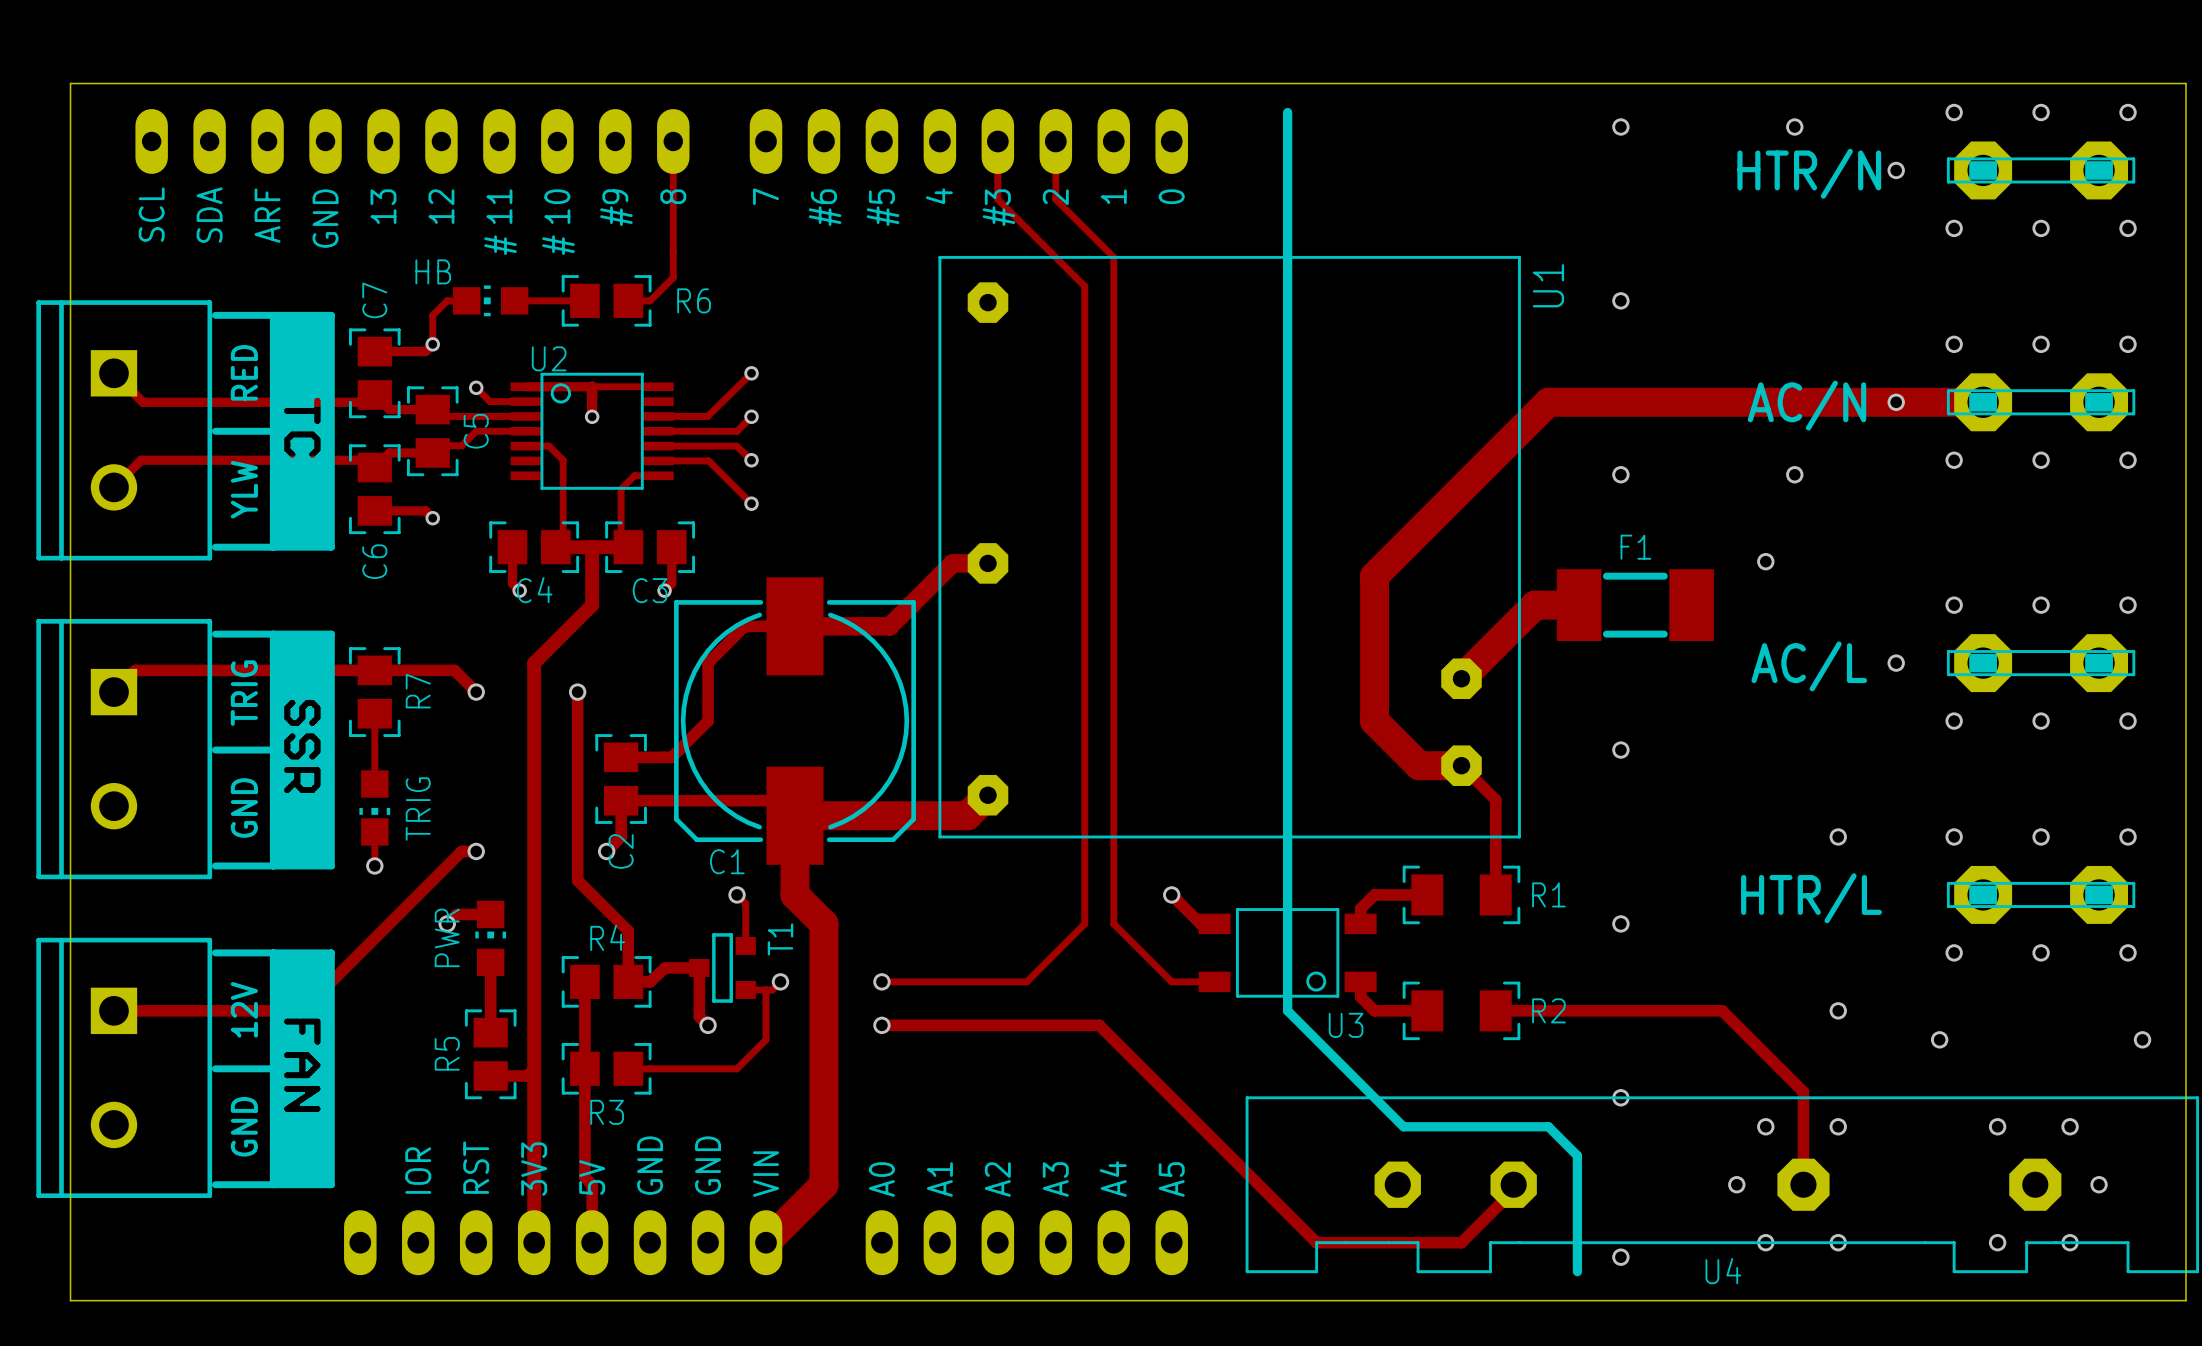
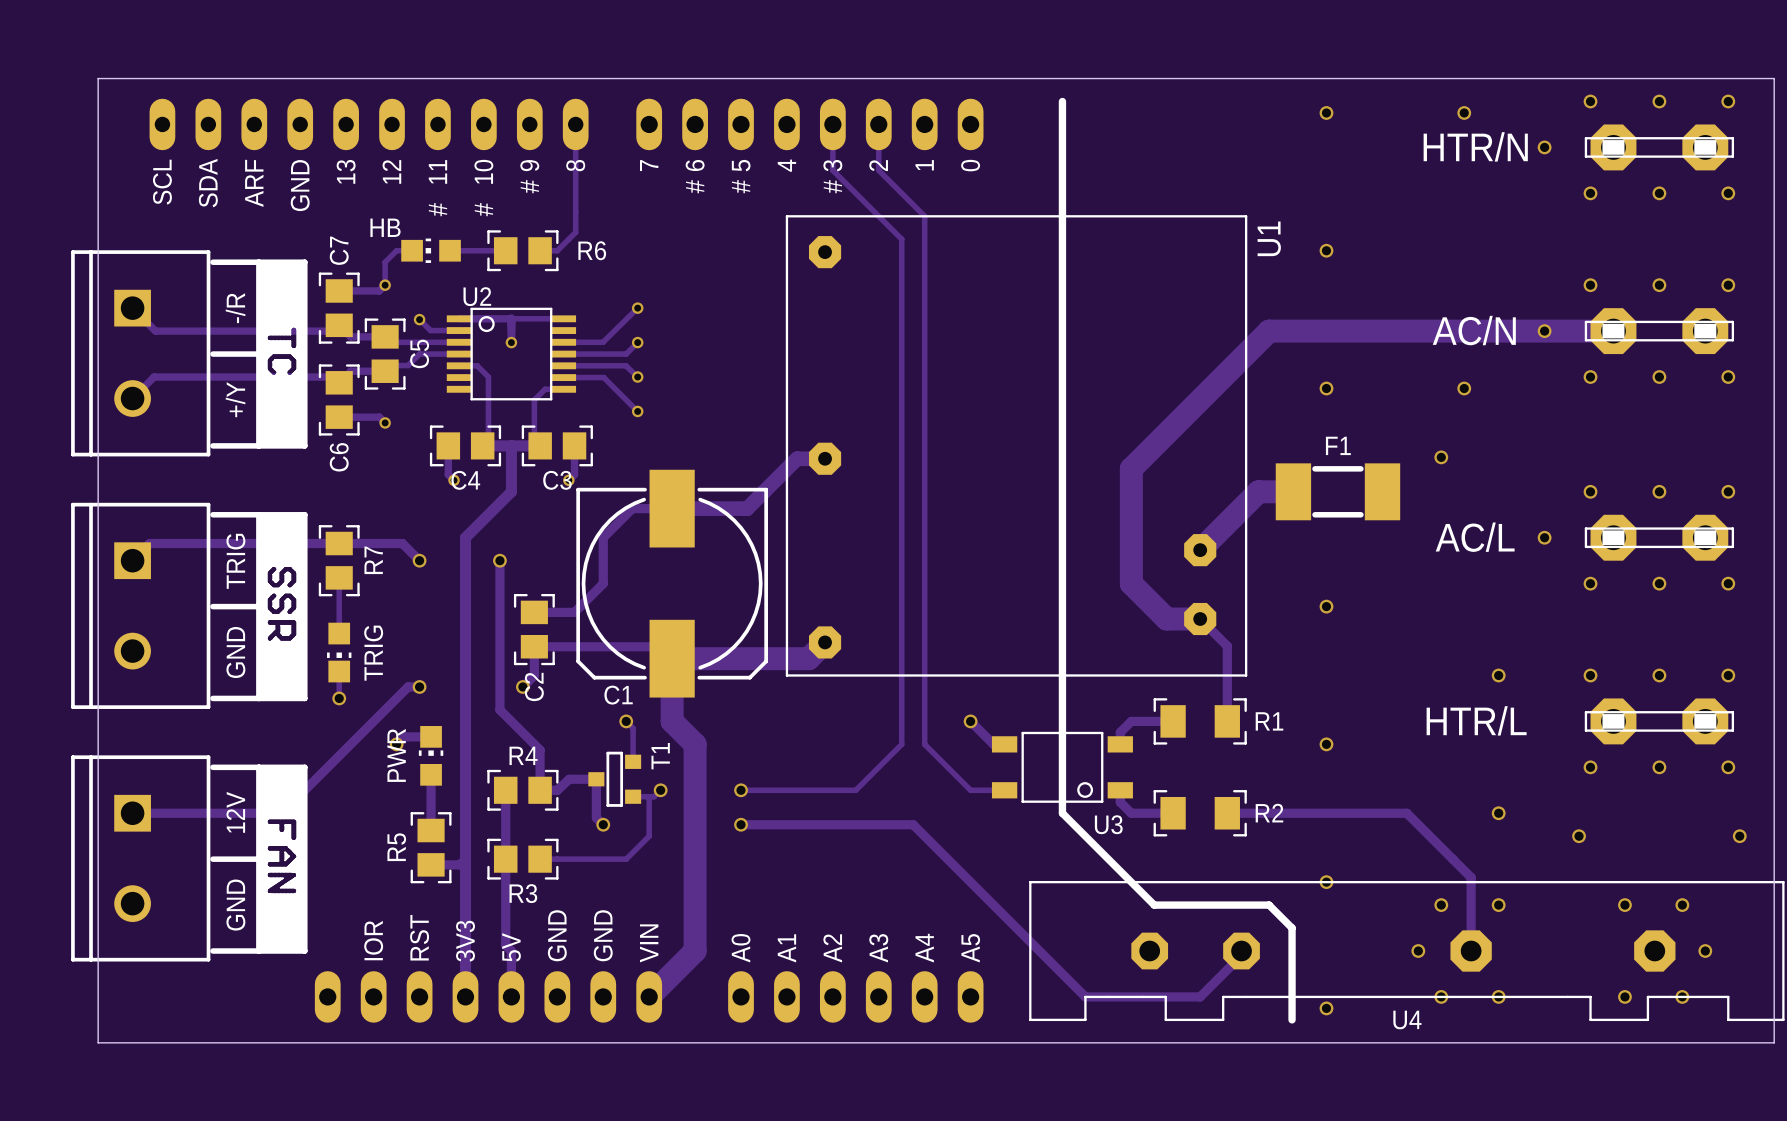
drawing shape: [211, 311, 335, 551] -> [210, 259, 308, 449]

